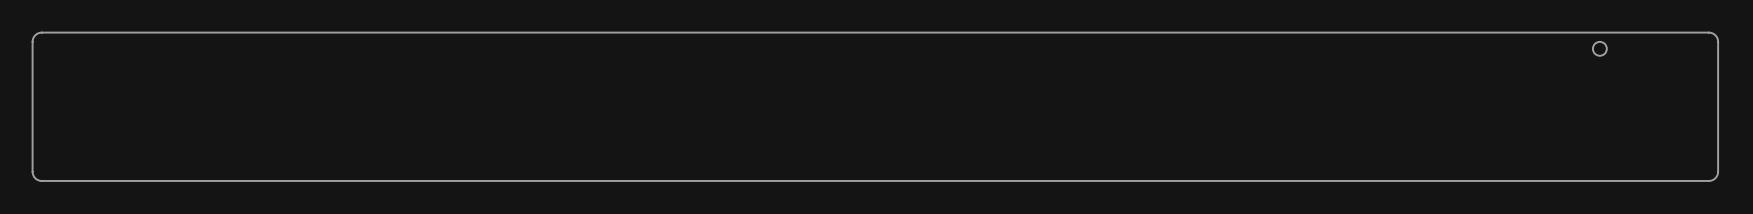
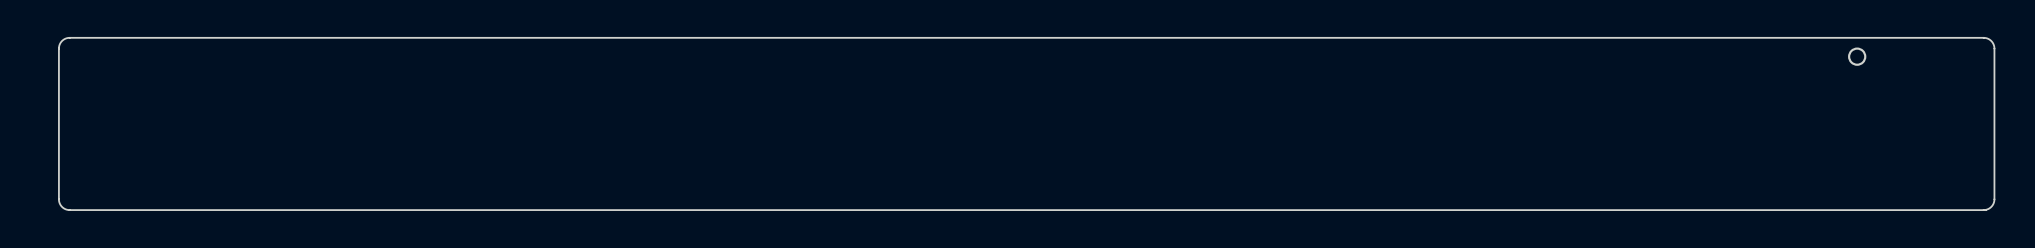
board edge: (60, 32) (38, 33) (34, 36) (32, 41) (32, 173) (39, 180) (60, 180) -> (69, 37) (62, 40) (58, 48) (58, 200) (62, 207) (69, 210)

